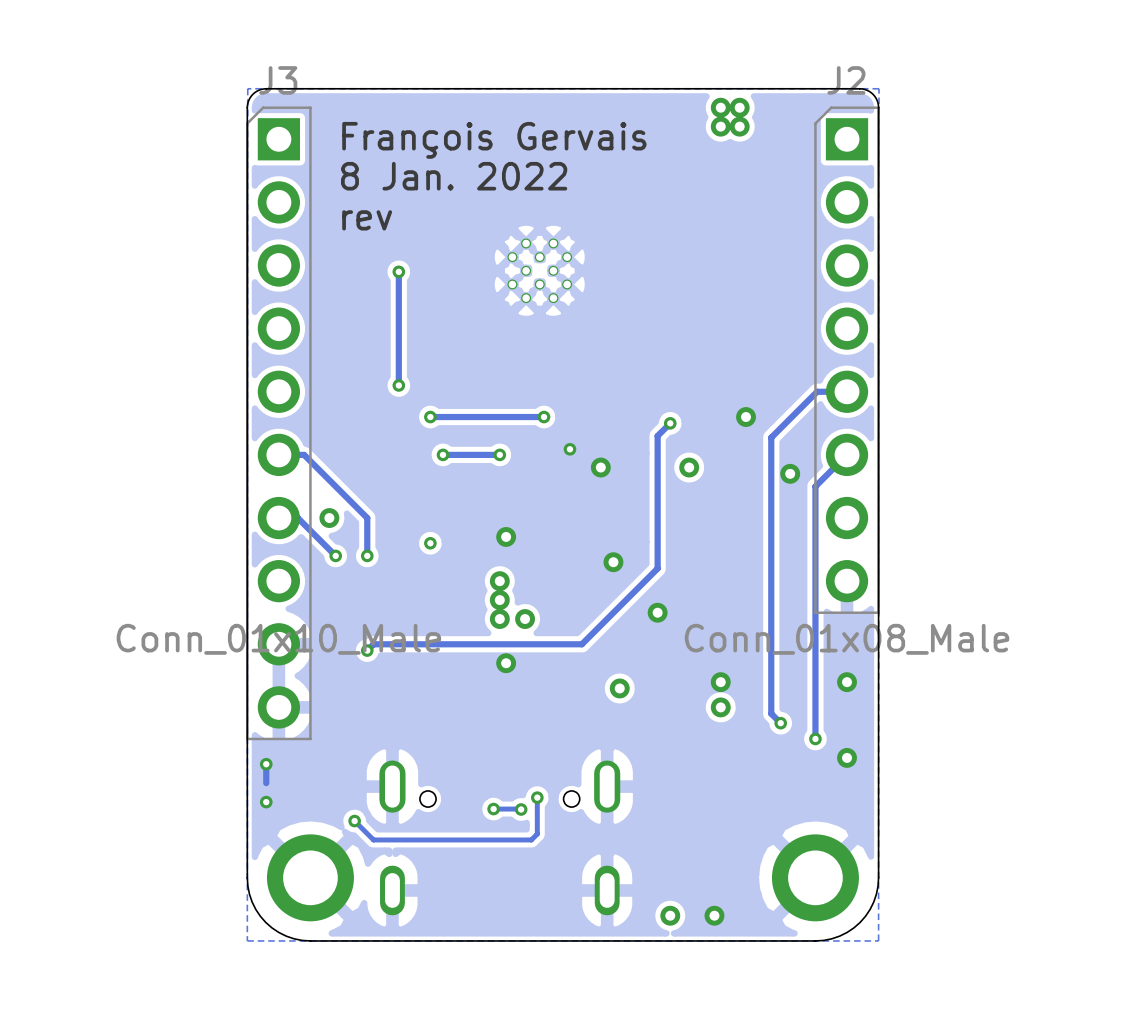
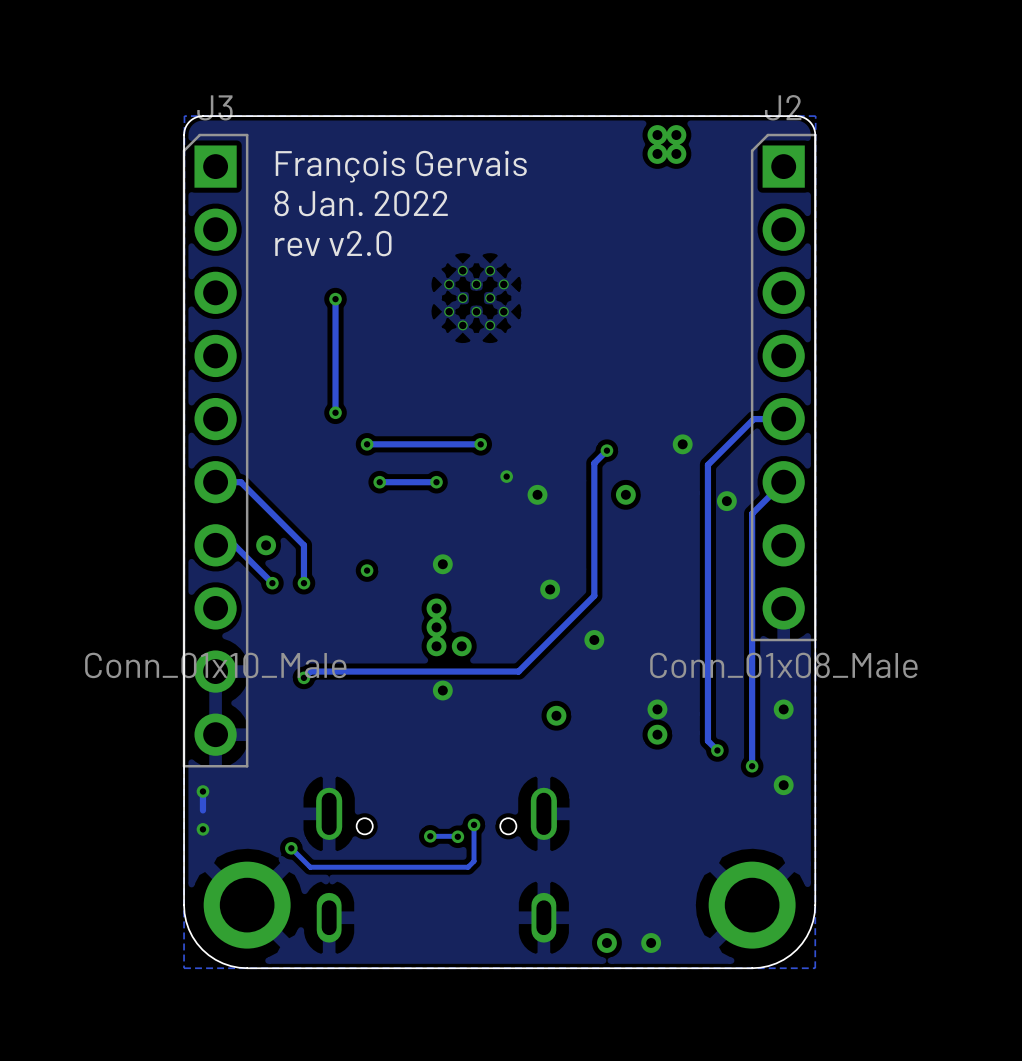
text: rev (367, 220) -> rev v2.0 (333, 243)

